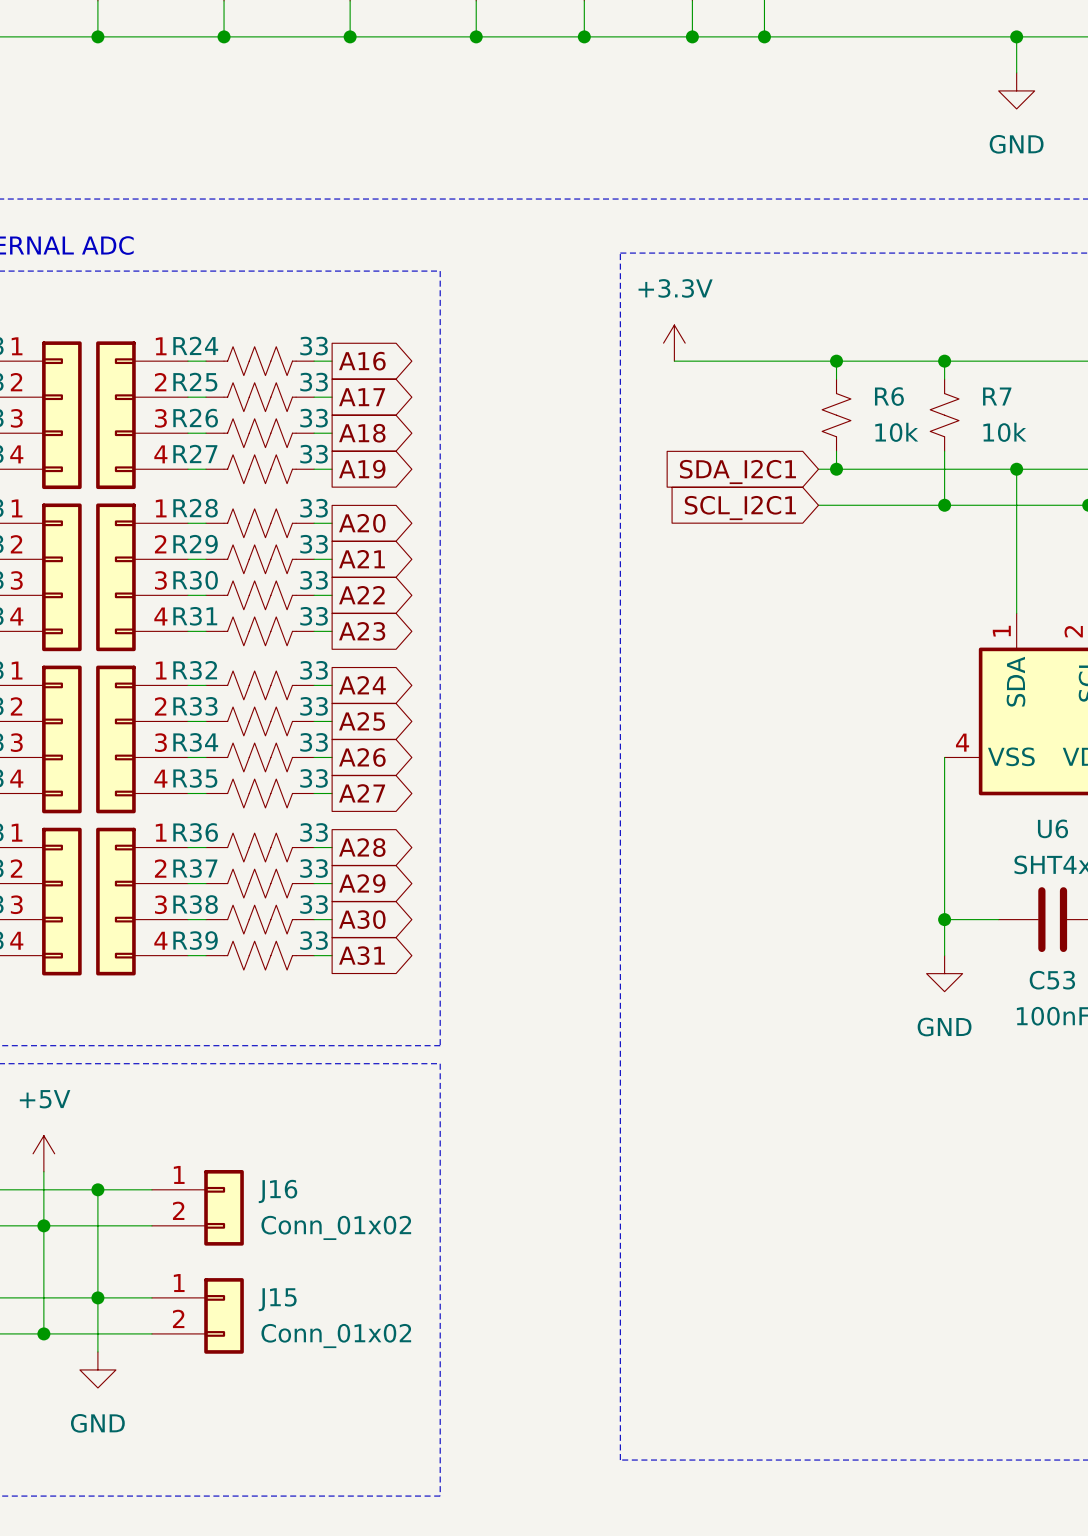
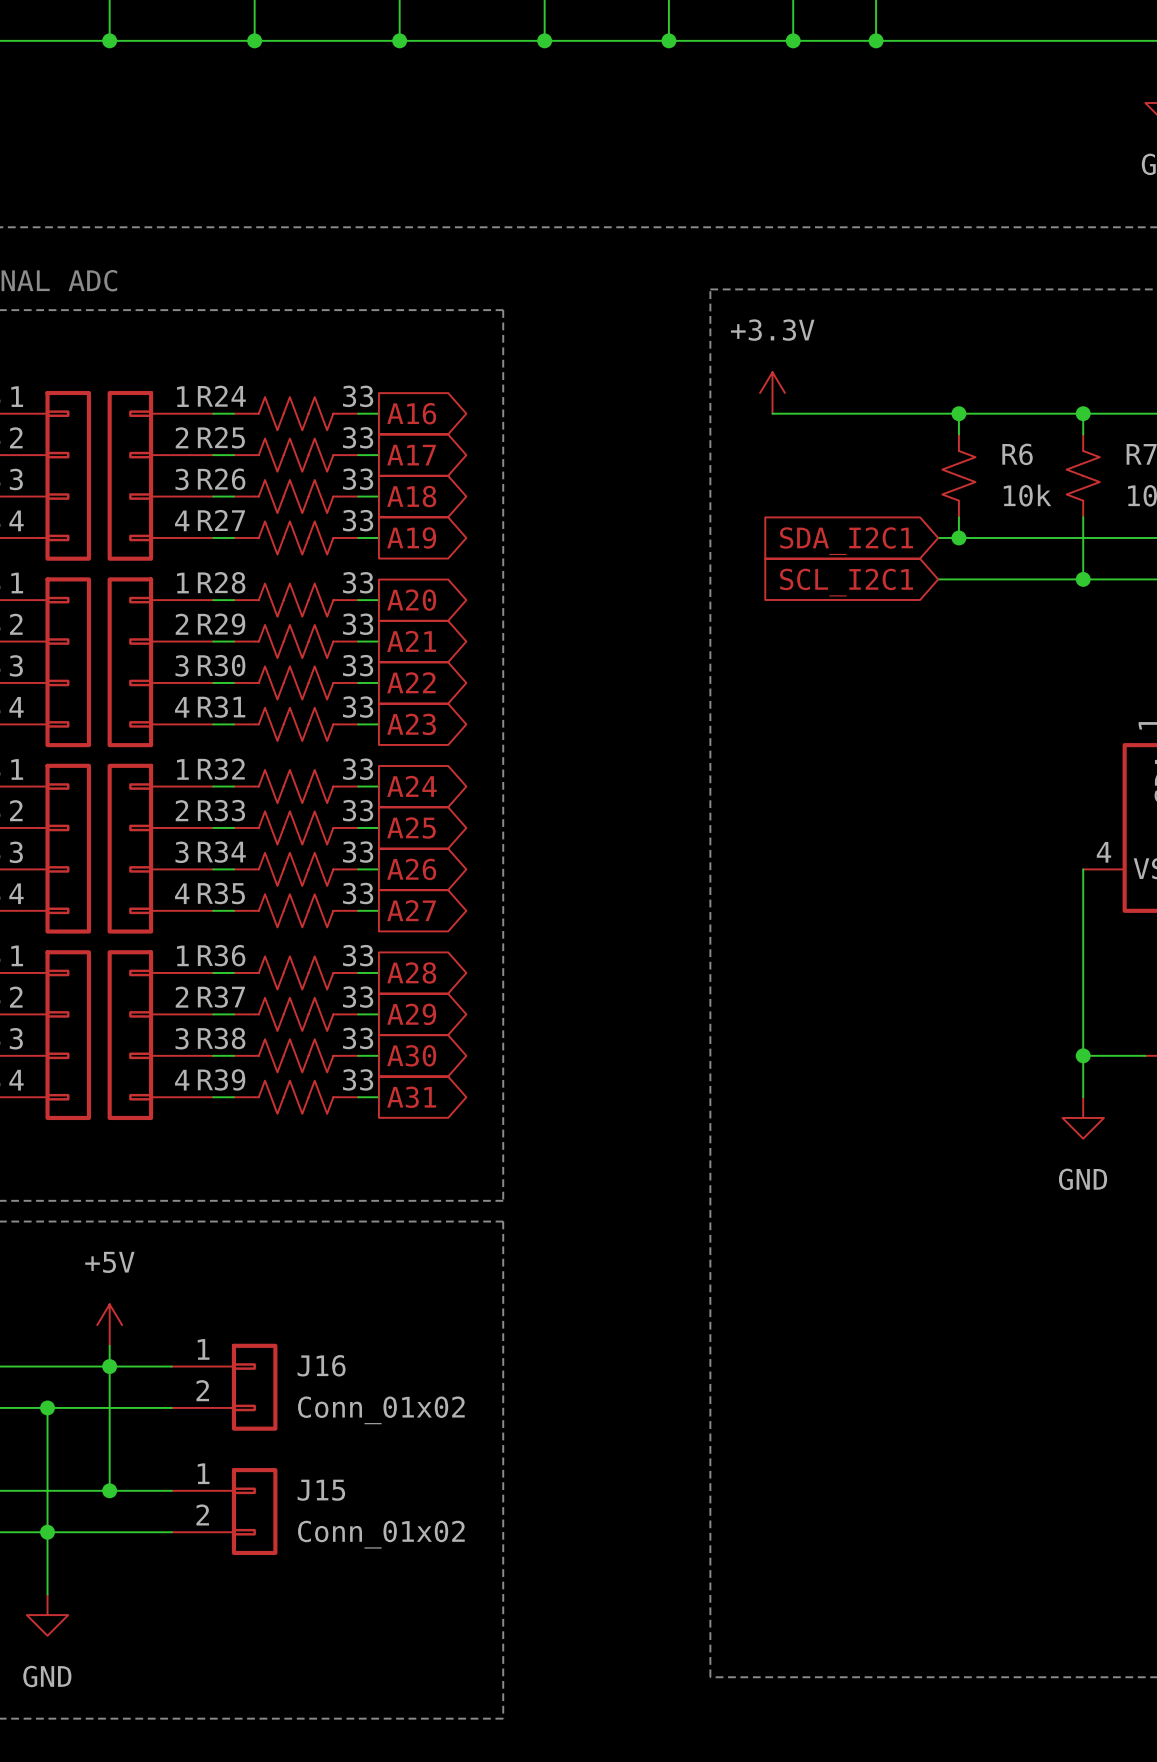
power symbol position: +5V (43, 1153) -> +5V (109, 1325)
wire: (43, 1171) (43, 1225) -> none
wire: none -> (109, 1345) (109, 1366)
wire: (97, 1297) (97, 1351) -> (47, 1532) (47, 1594)
power symbol position: GND (97, 1369) -> GND (47, 1615)

